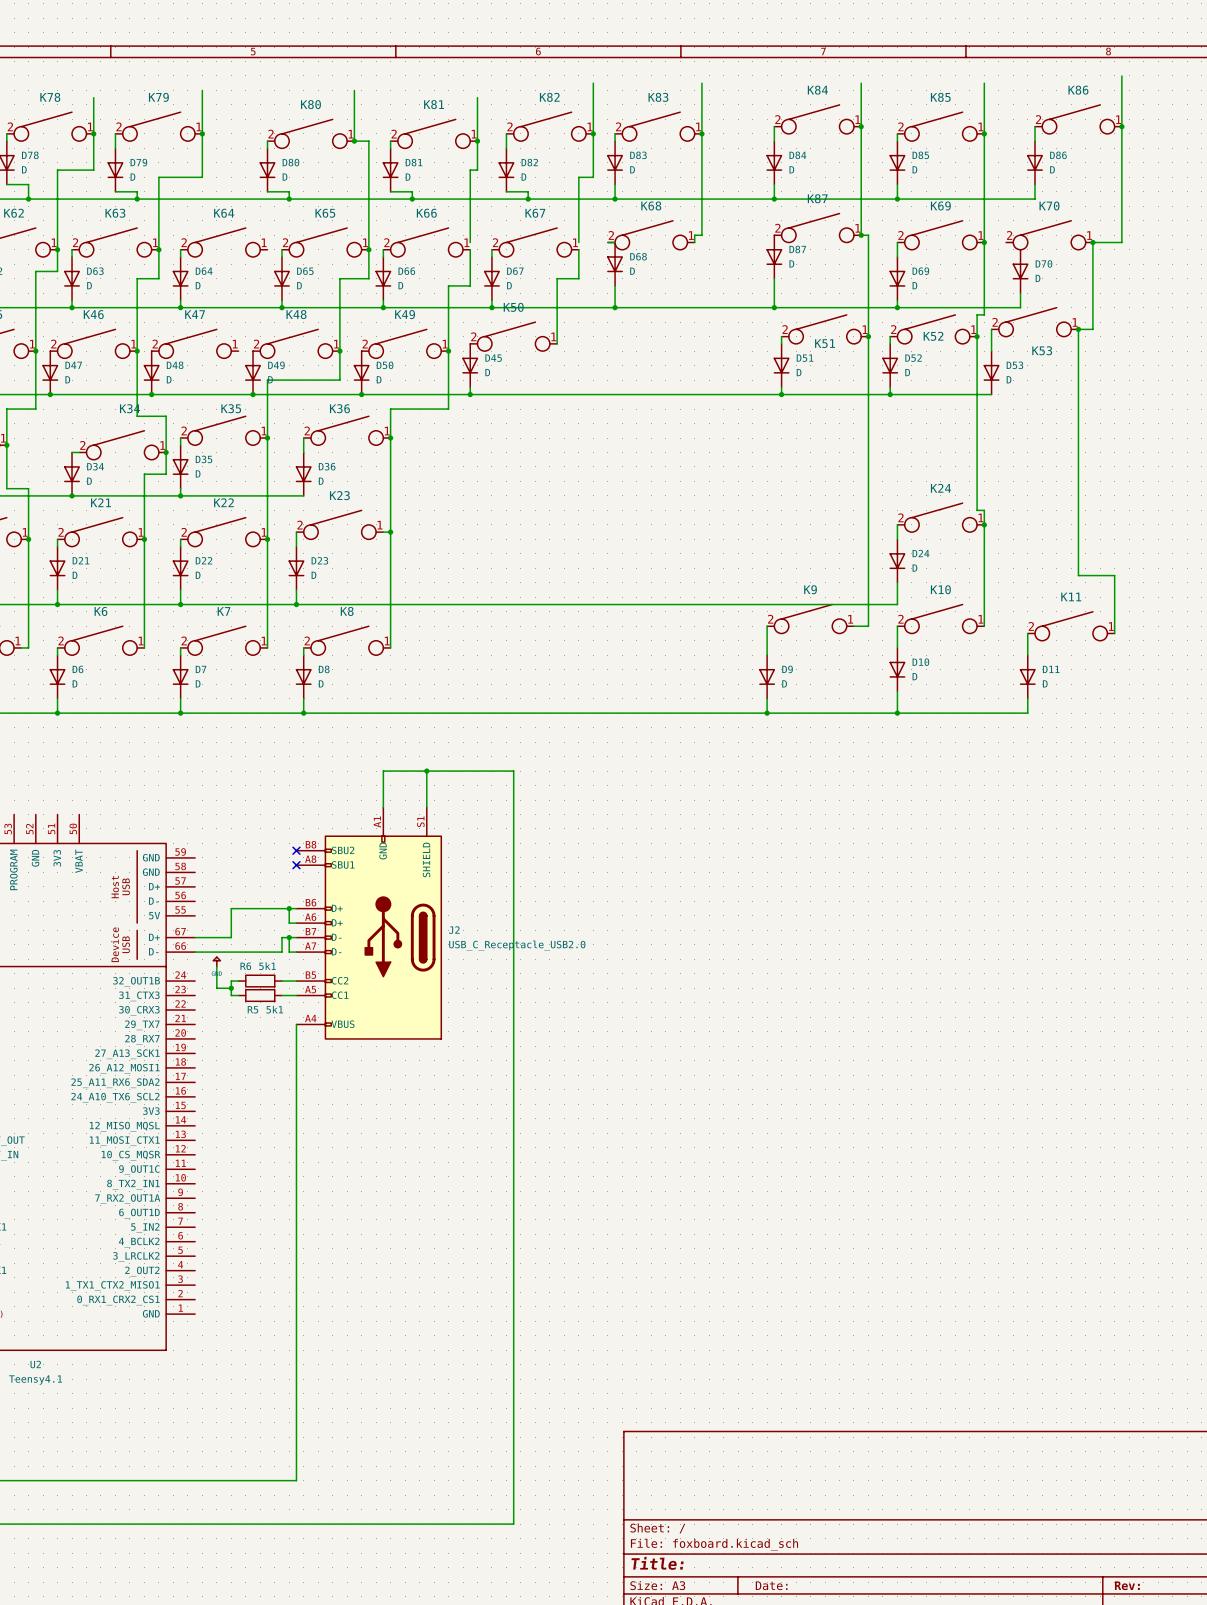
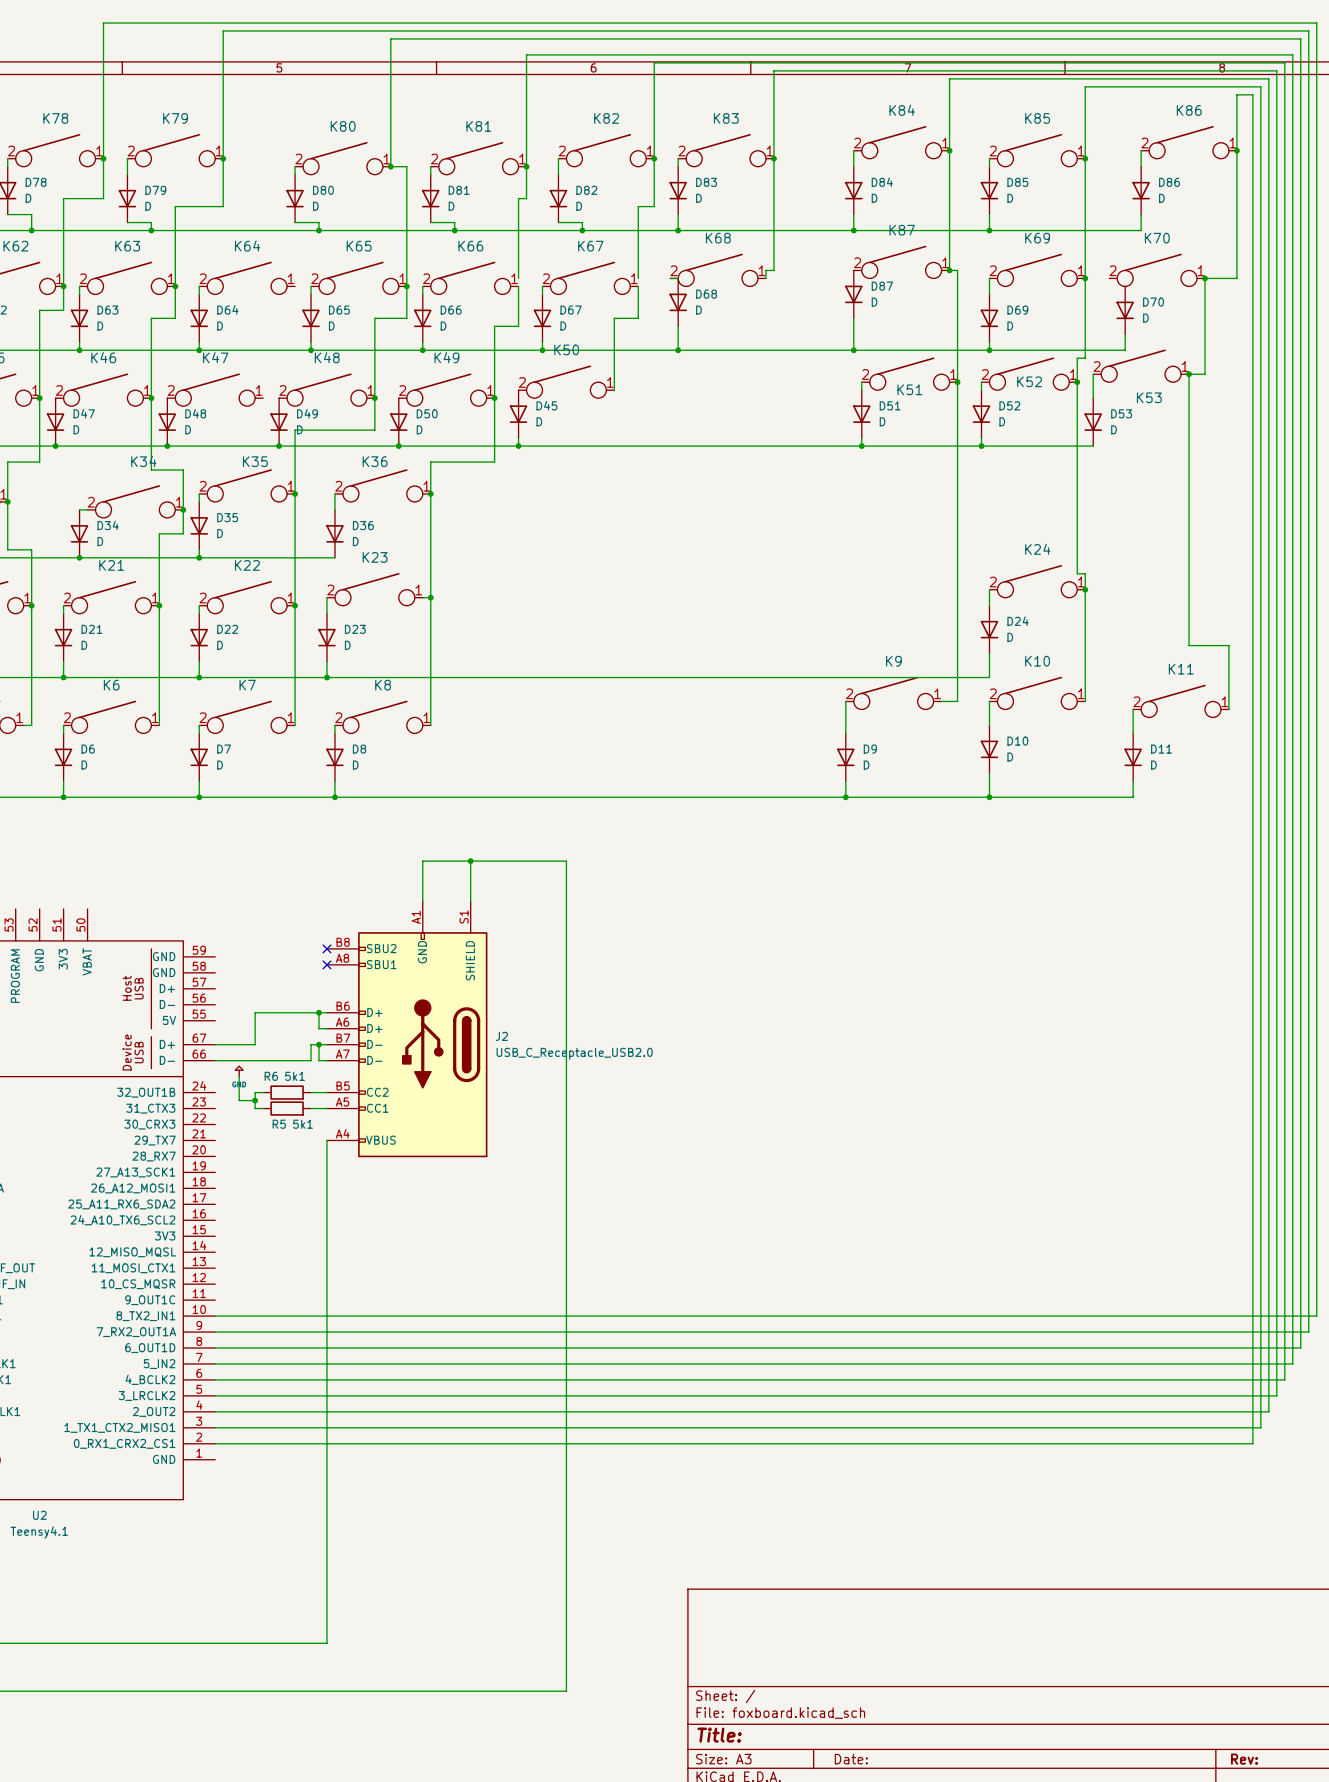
wire: none -> (1236, 94) (1252, 94) (1252, 1443) (215, 1443)
wire: none -> (654, 102) (654, 62) (1284, 62) (1284, 1379) (215, 1379)
wire: none -> (773, 102) (773, 70) (1276, 70) (1276, 1395) (215, 1395)
wire: none -> (949, 102) (949, 78) (1268, 78) (1268, 1411) (215, 1411)
wire: none -> (1085, 102) (1085, 86) (1260, 86) (1260, 1427) (215, 1427)
wire: none -> (223, 110) (223, 31) (1308, 31) (1308, 1332) (215, 1332)
wire: none -> (390, 110) (390, 38) (1300, 38) (1300, 1348) (215, 1348)
wire: none -> (103, 118) (103, 23) (1316, 23) (1316, 1316) (215, 1316)
wire: none -> (526, 118) (526, 54) (1292, 54) (1292, 1363) (215, 1363)

